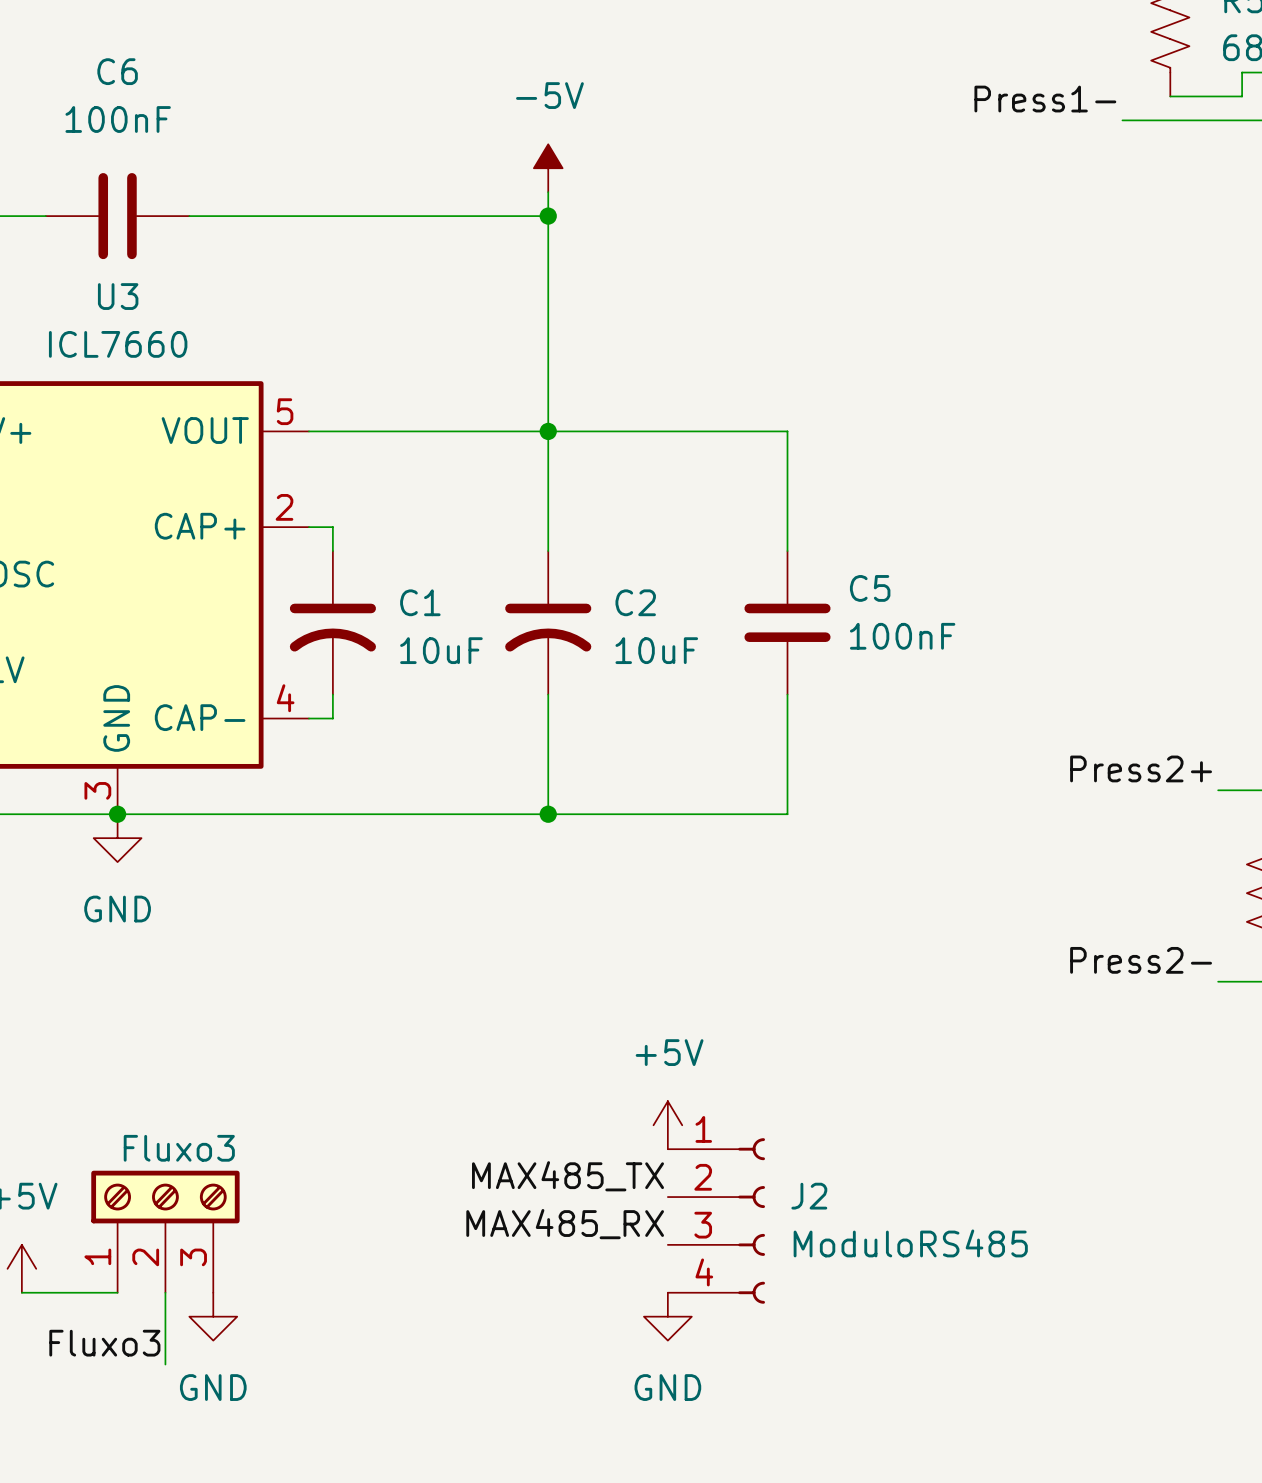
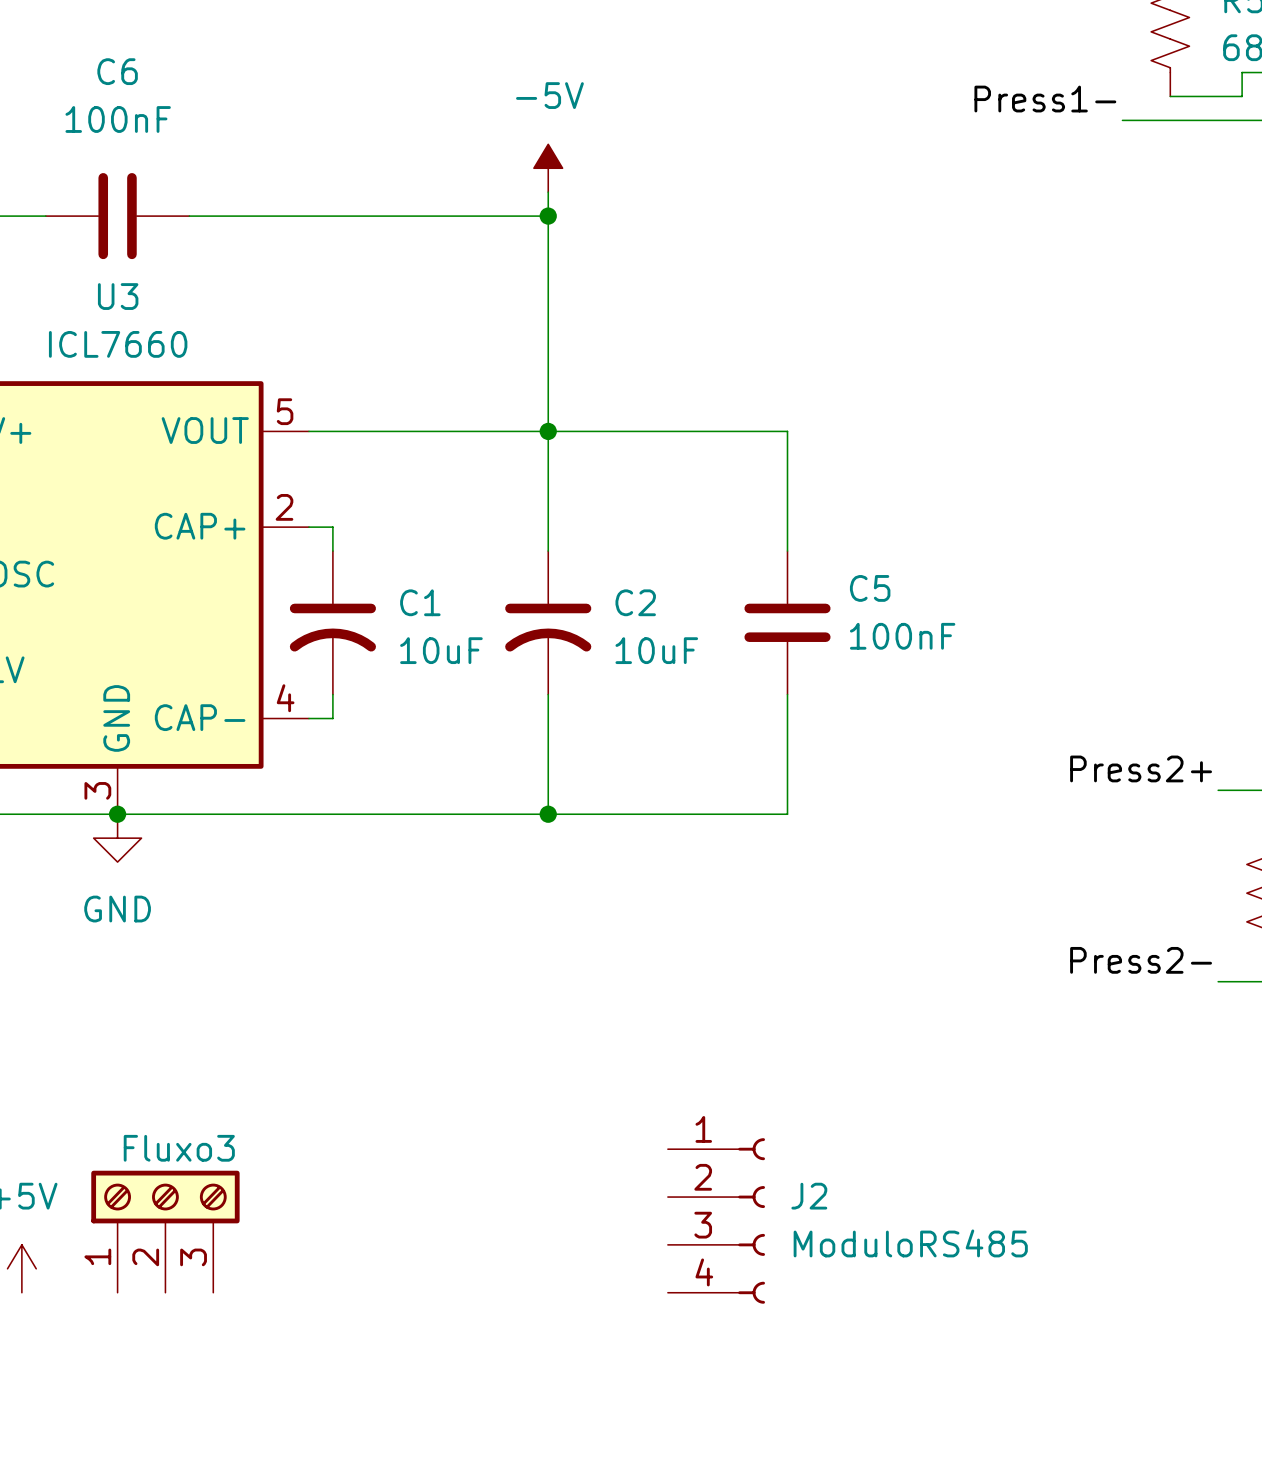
power symbol: +5V (667, 1125) -> none
label: MAX485_TX (568, 1176) -> none
label: MAX485_RX (565, 1224) -> none
wire: (21, 1292) (117, 1292) -> none
wire: (165, 1292) (165, 1364) -> none
power symbol: GND (213, 1316) -> none
power symbol: GND (667, 1316) -> none
label: Fluxo3 (104, 1343) -> none

